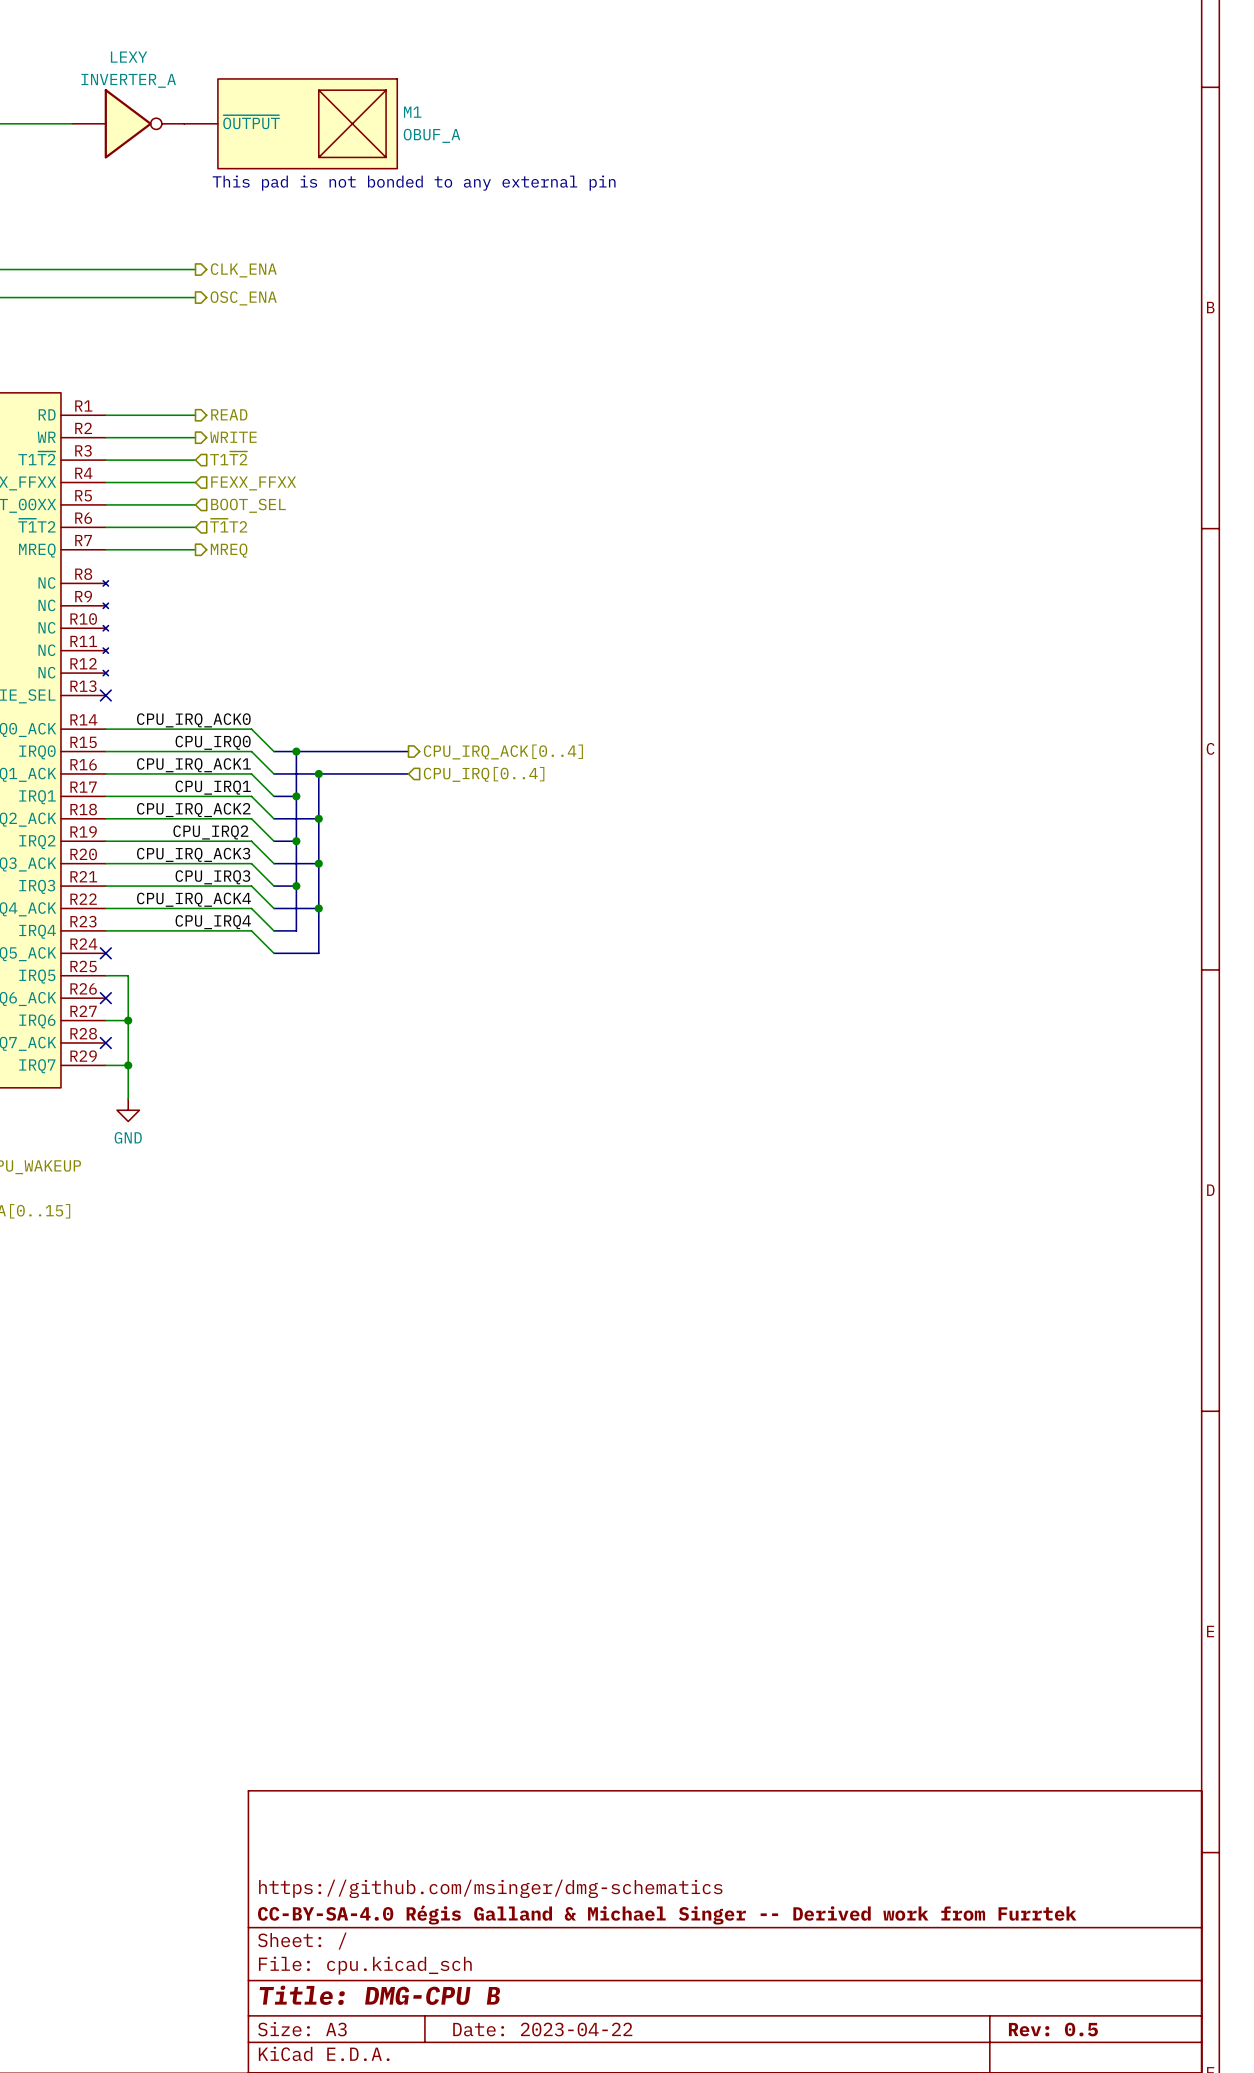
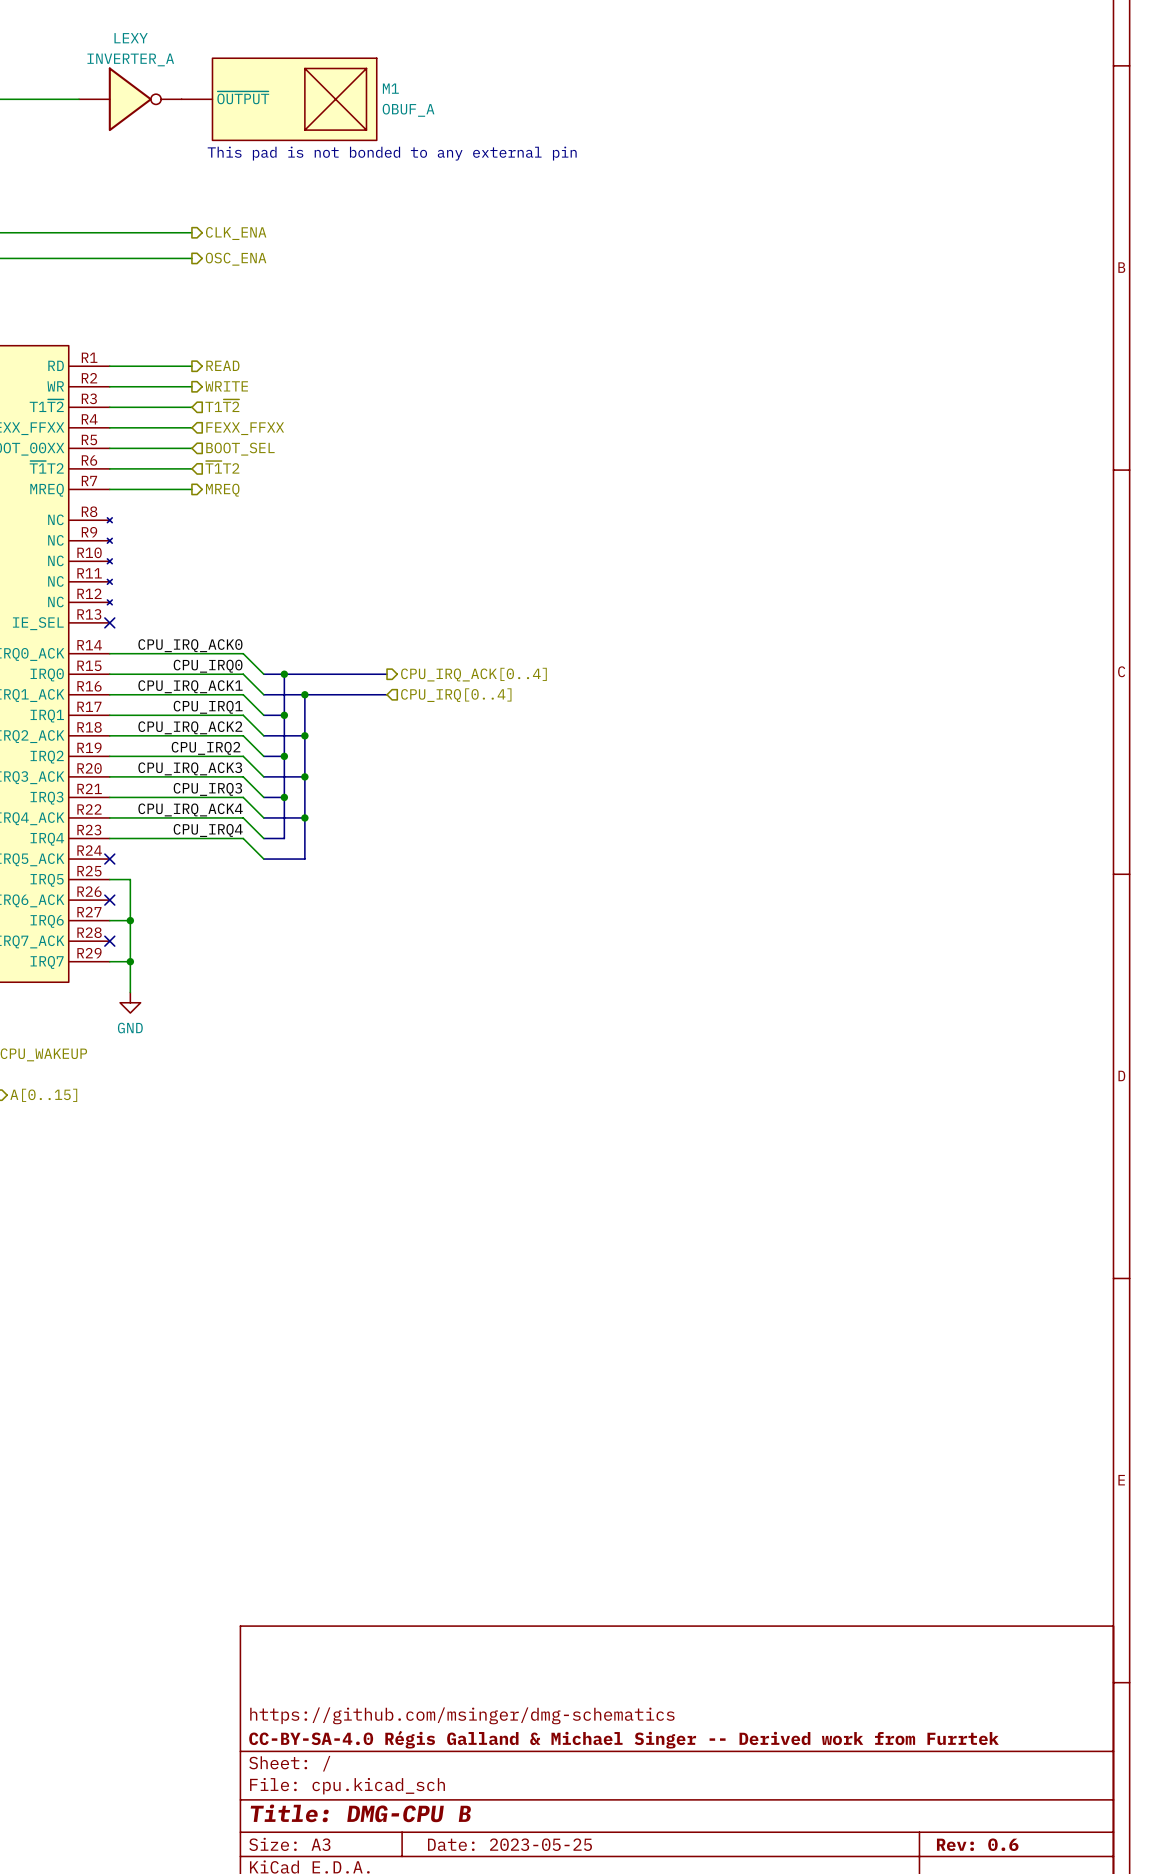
title block: Date: 2023-04-22 (542, 2029) -> Date: 2023-05-25 (509, 1844)
title block: Rev: 0.5 (1053, 2029) -> Rev: 0.6 (977, 1844)

